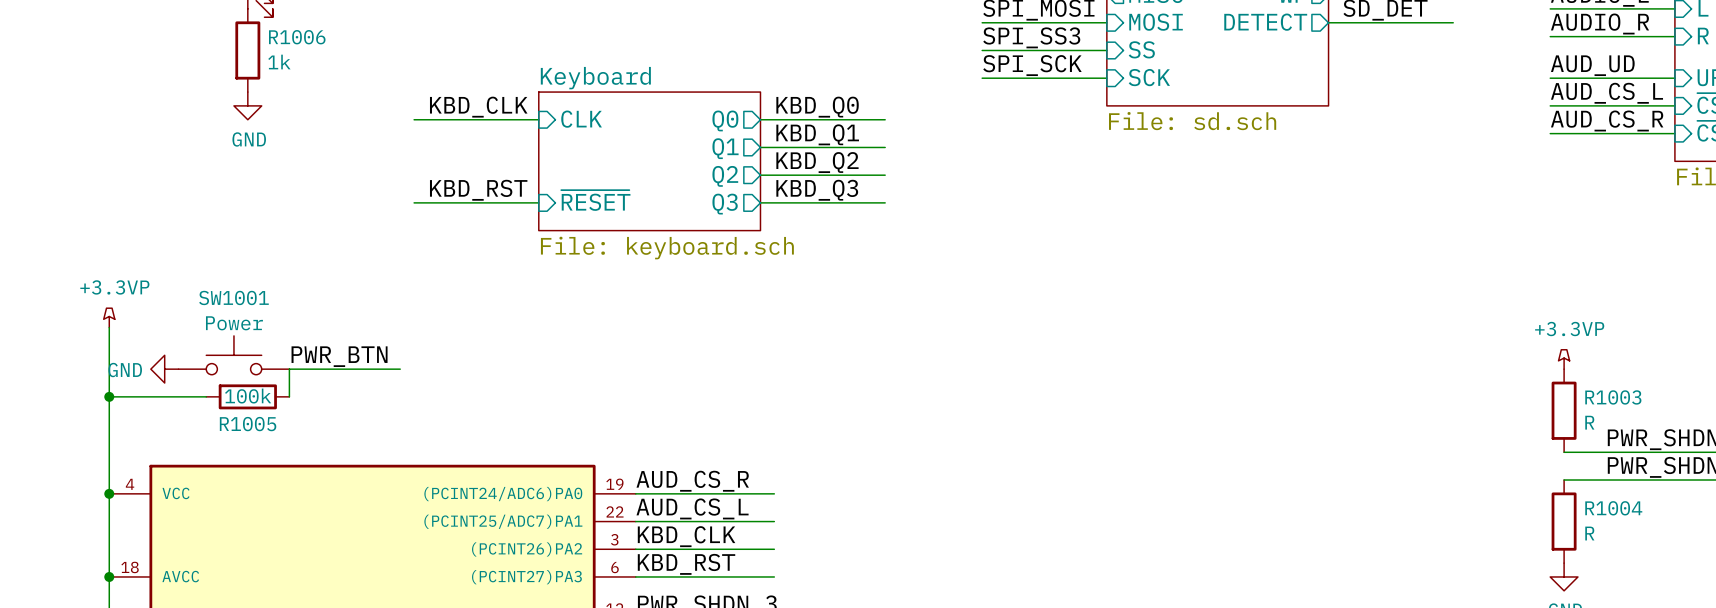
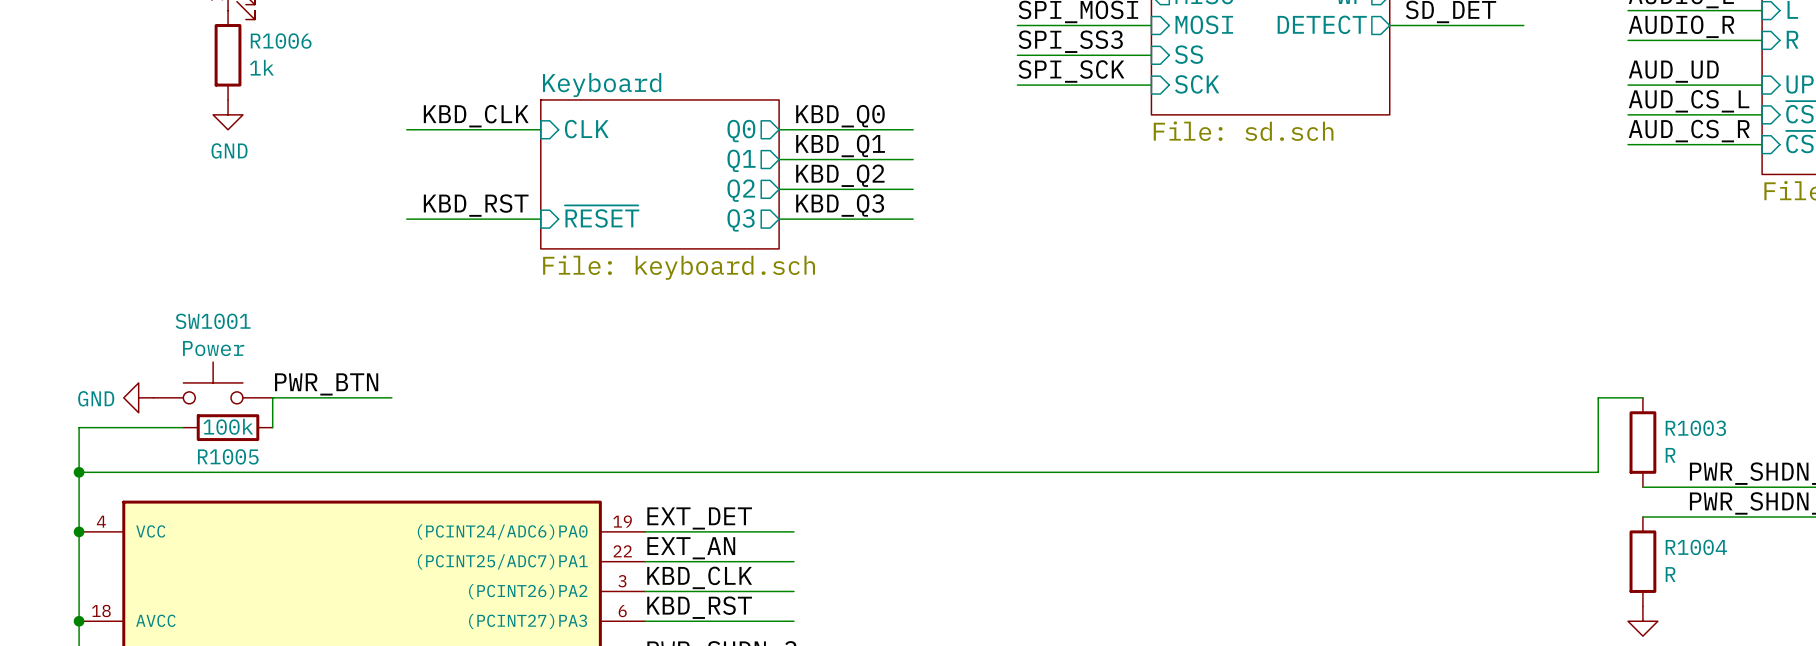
power symbol: +3.3VP (109, 317) -> none
wire: (109, 327) (109, 396) -> none
power symbol: +3.3VP (1564, 359) -> none
wire: none -> (1642, 397) (1598, 397) (1598, 472) (79, 472)
junction position: (109, 396) -> (79, 472)
label: AUD_CS_R (692, 481) -> EXT_DET (699, 518)
label: AUD_CS_L (692, 508) -> EXT_AN (691, 548)

